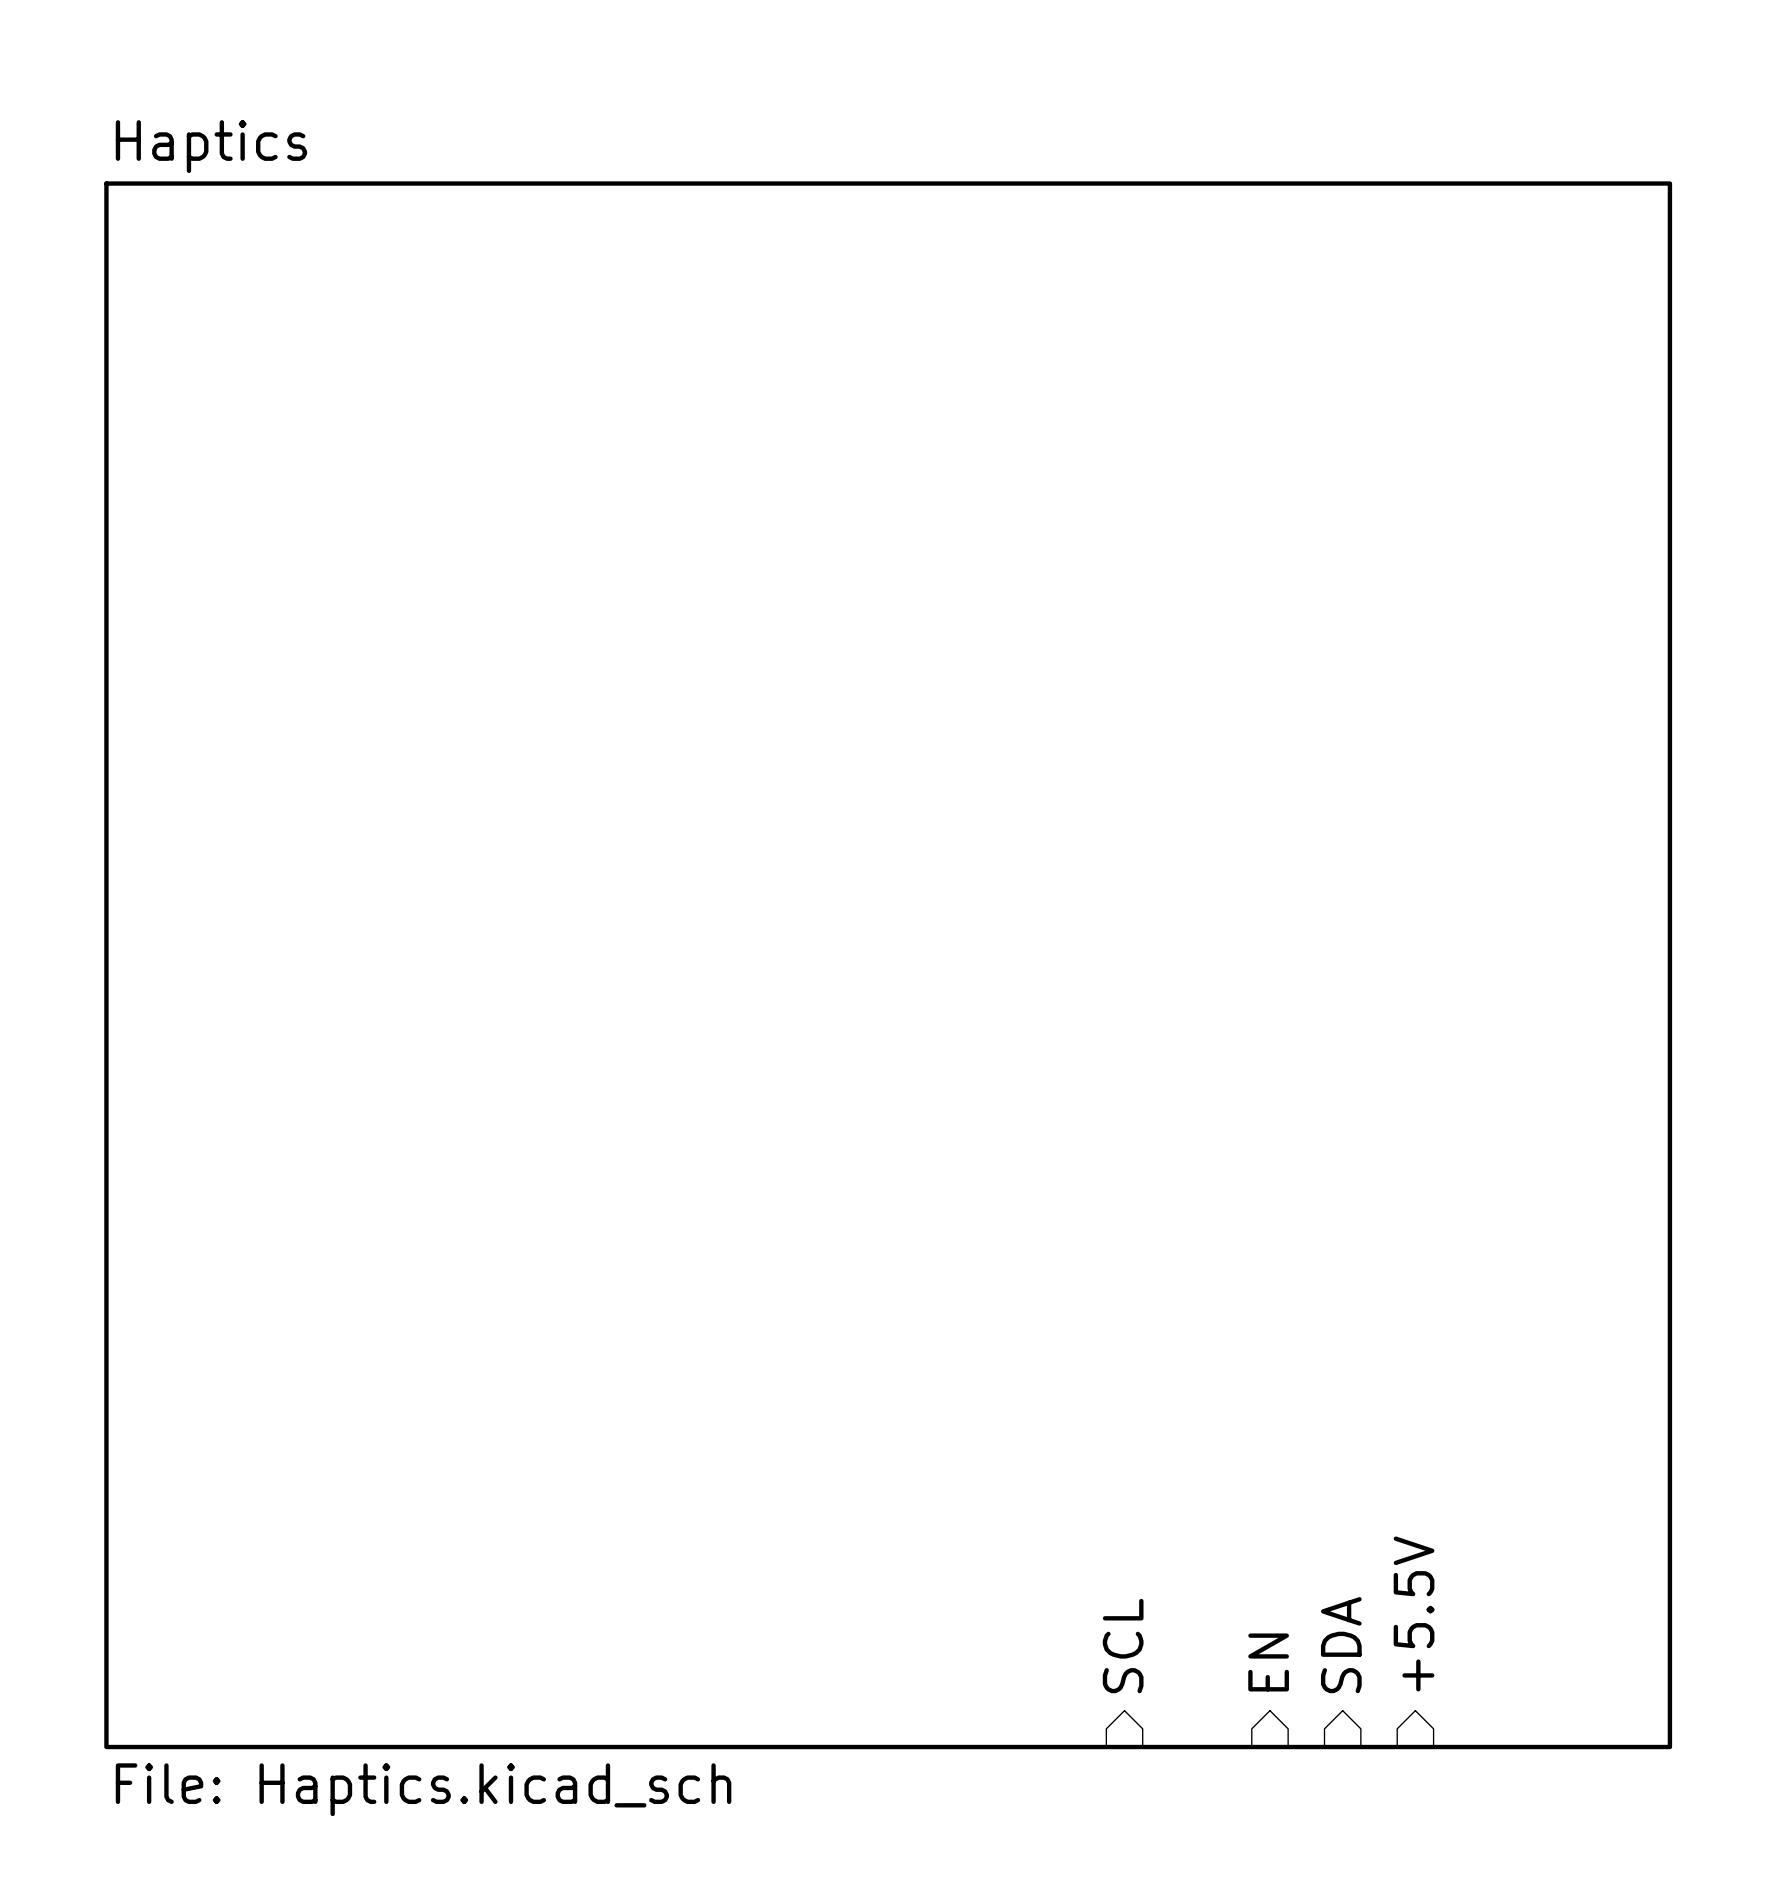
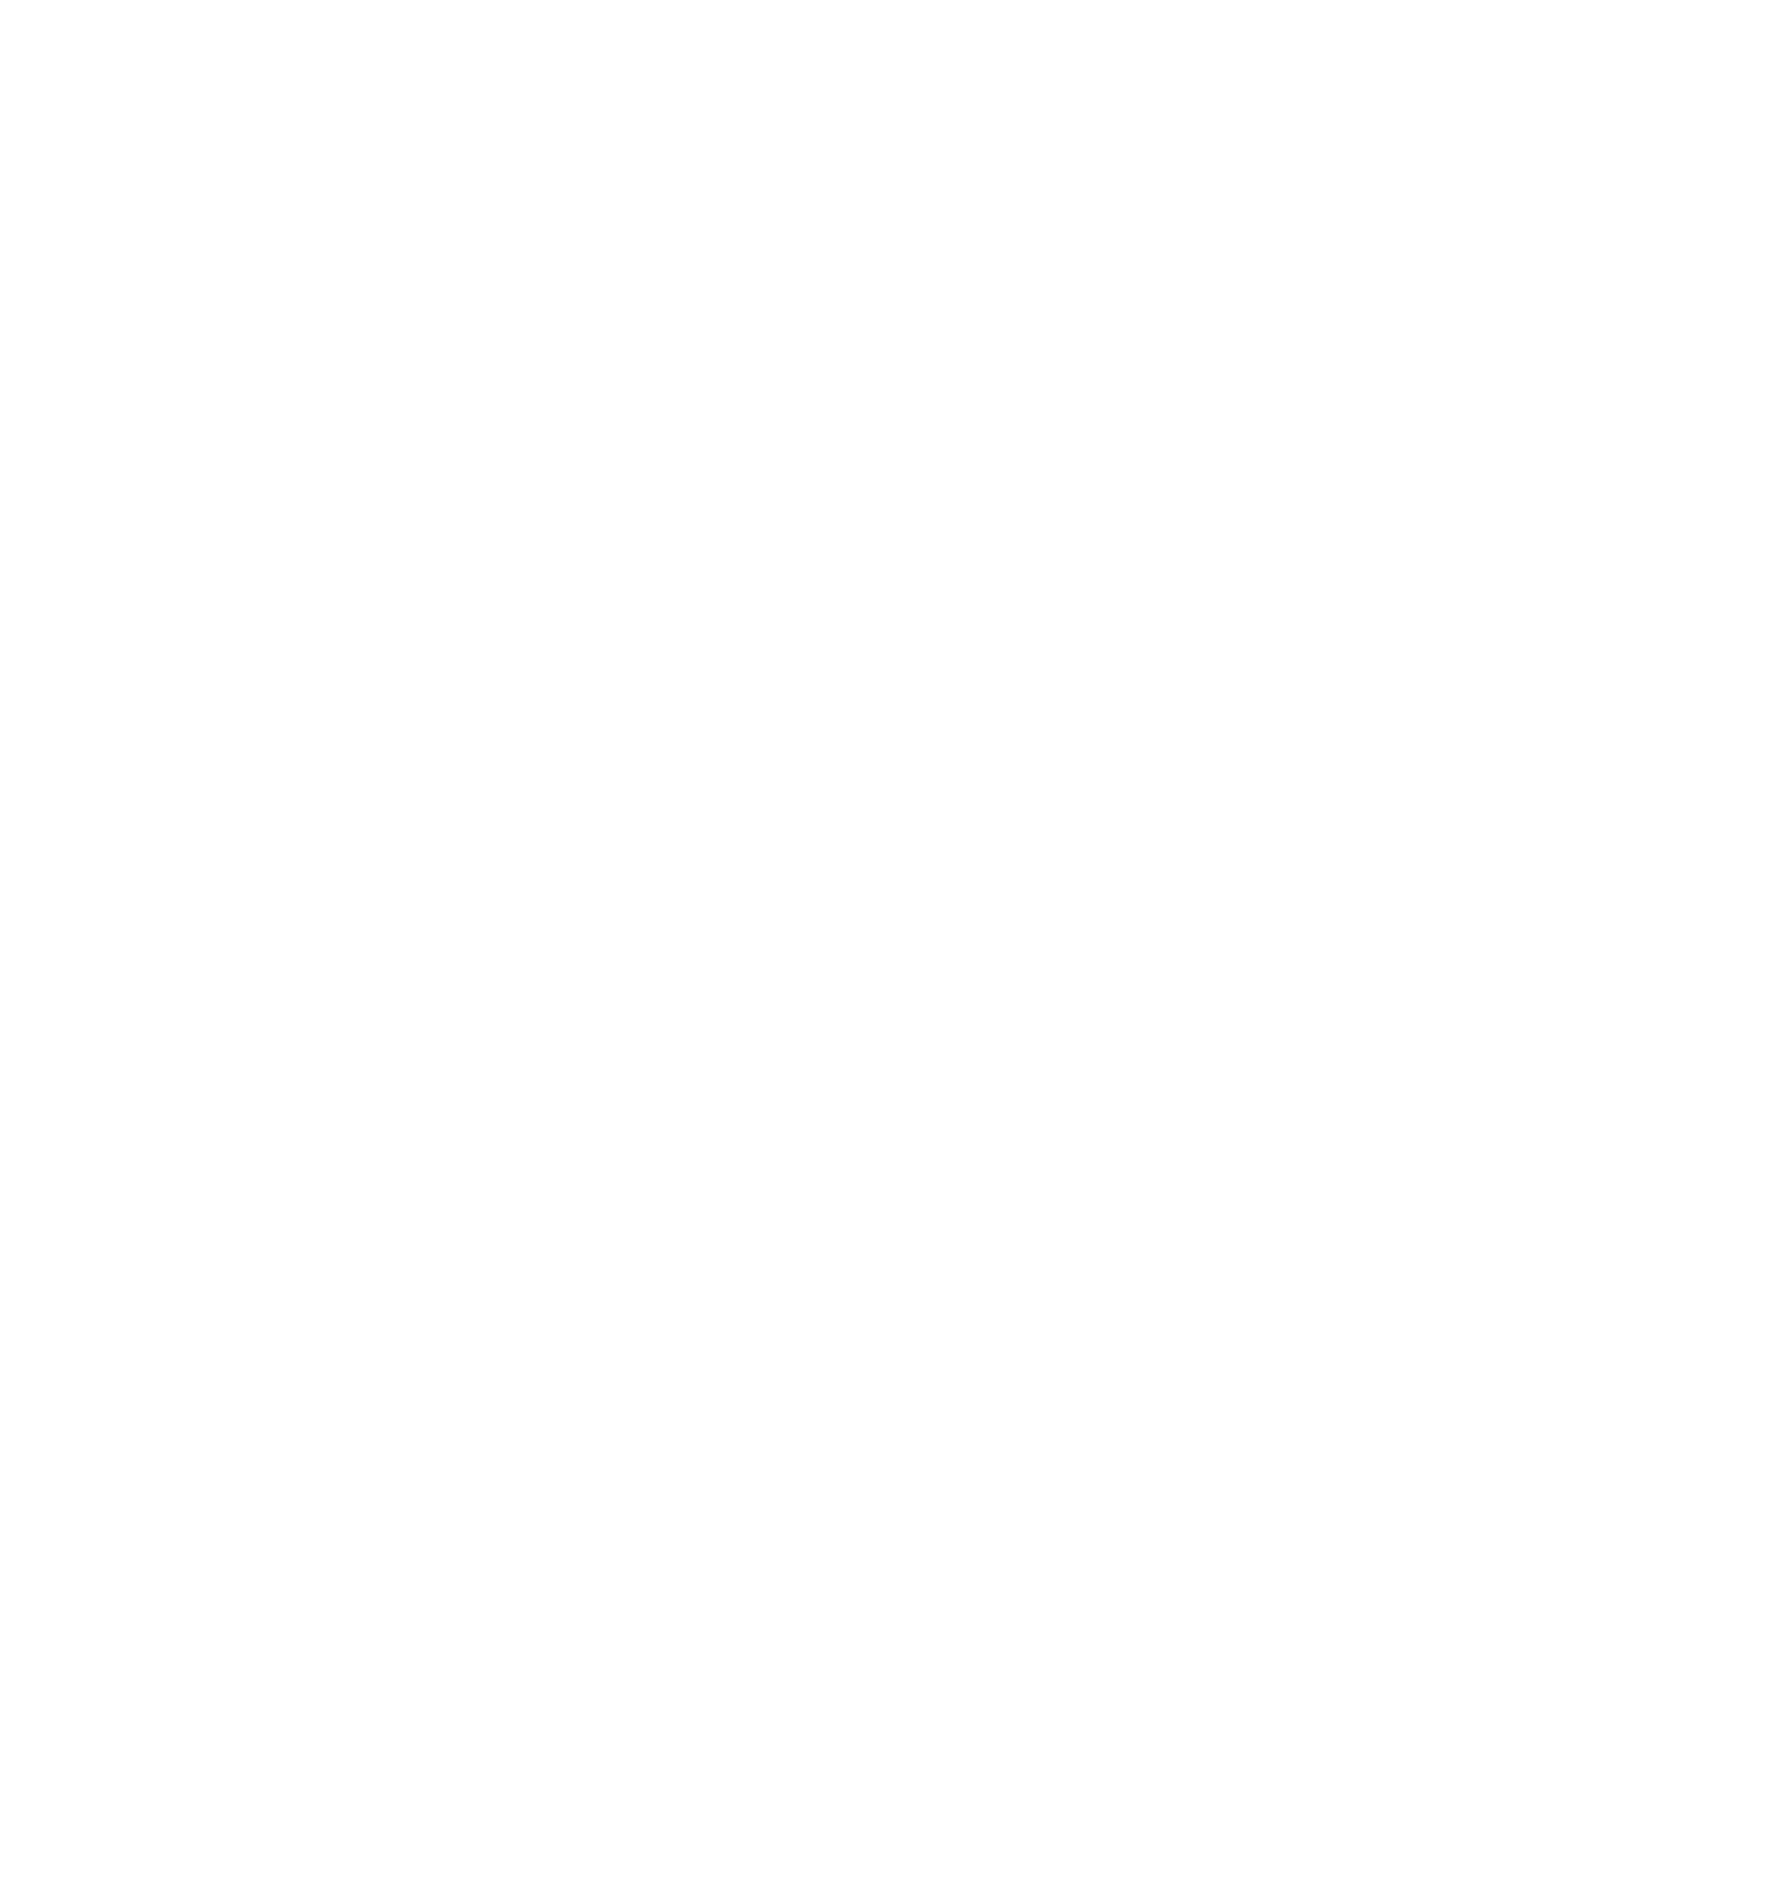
sheet Haptics: File: Haptics.kicad_sch (888, 965) -> none
sheet pin: +5.5V (1414, 1613) -> none
sheet pin: SDA (1341, 1645) -> none
sheet pin: SCL (1123, 1646) -> none
sheet pin: EN (1268, 1662) -> none

